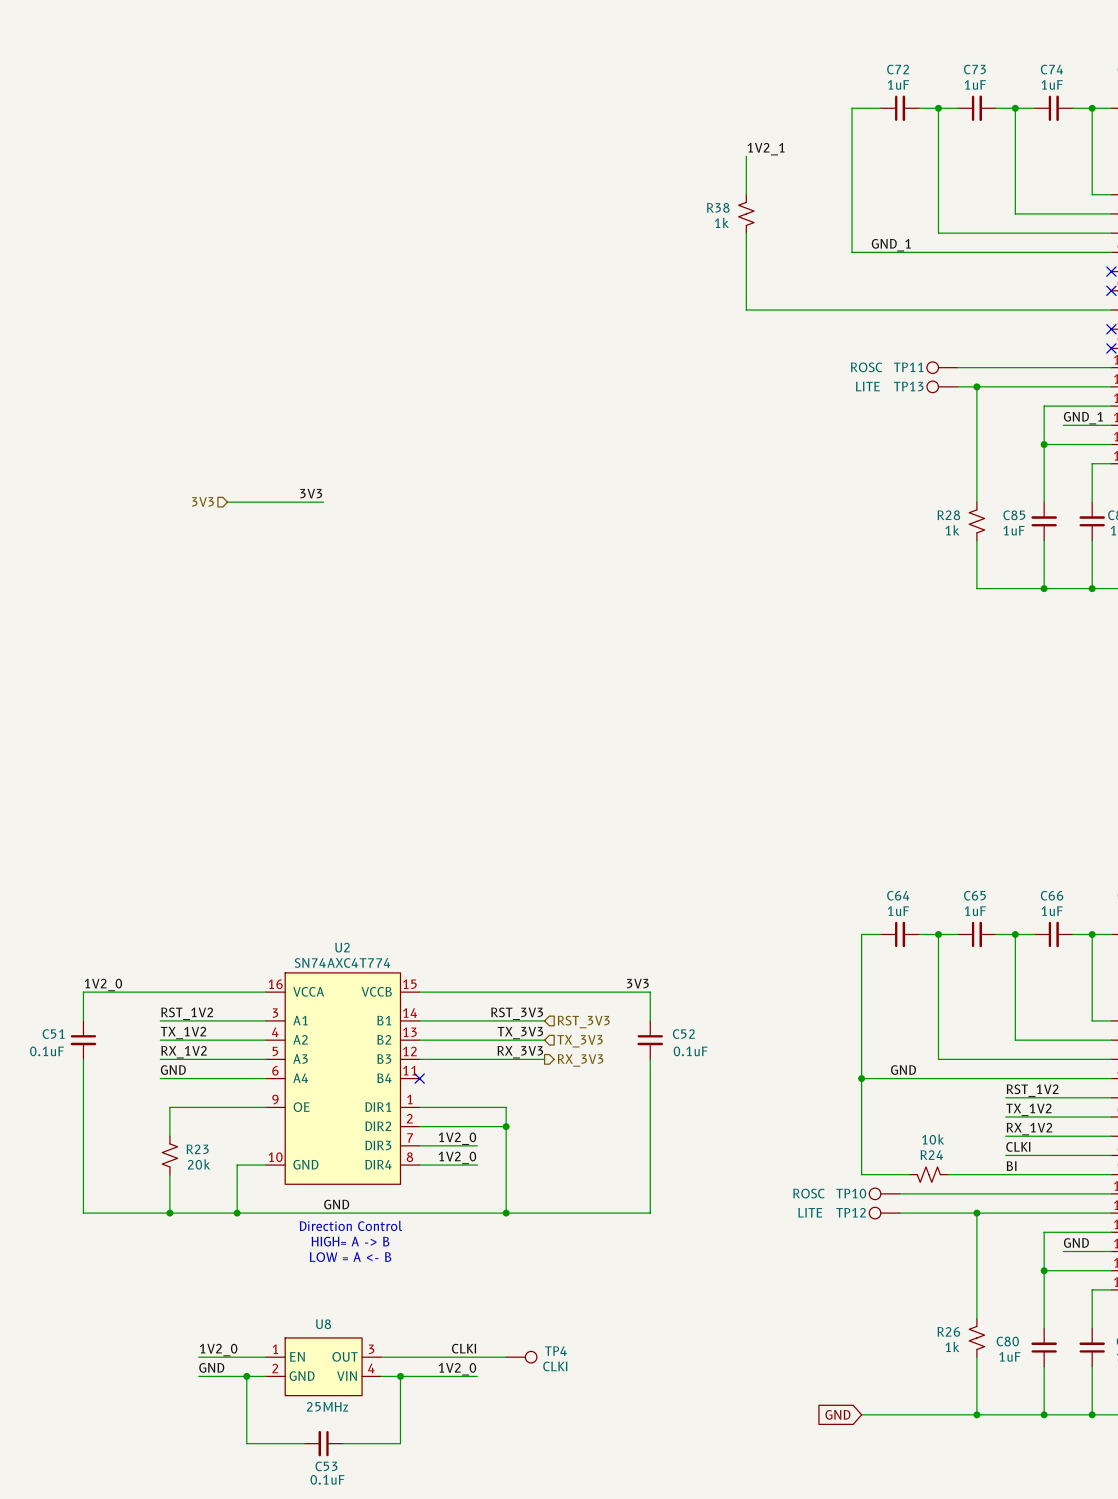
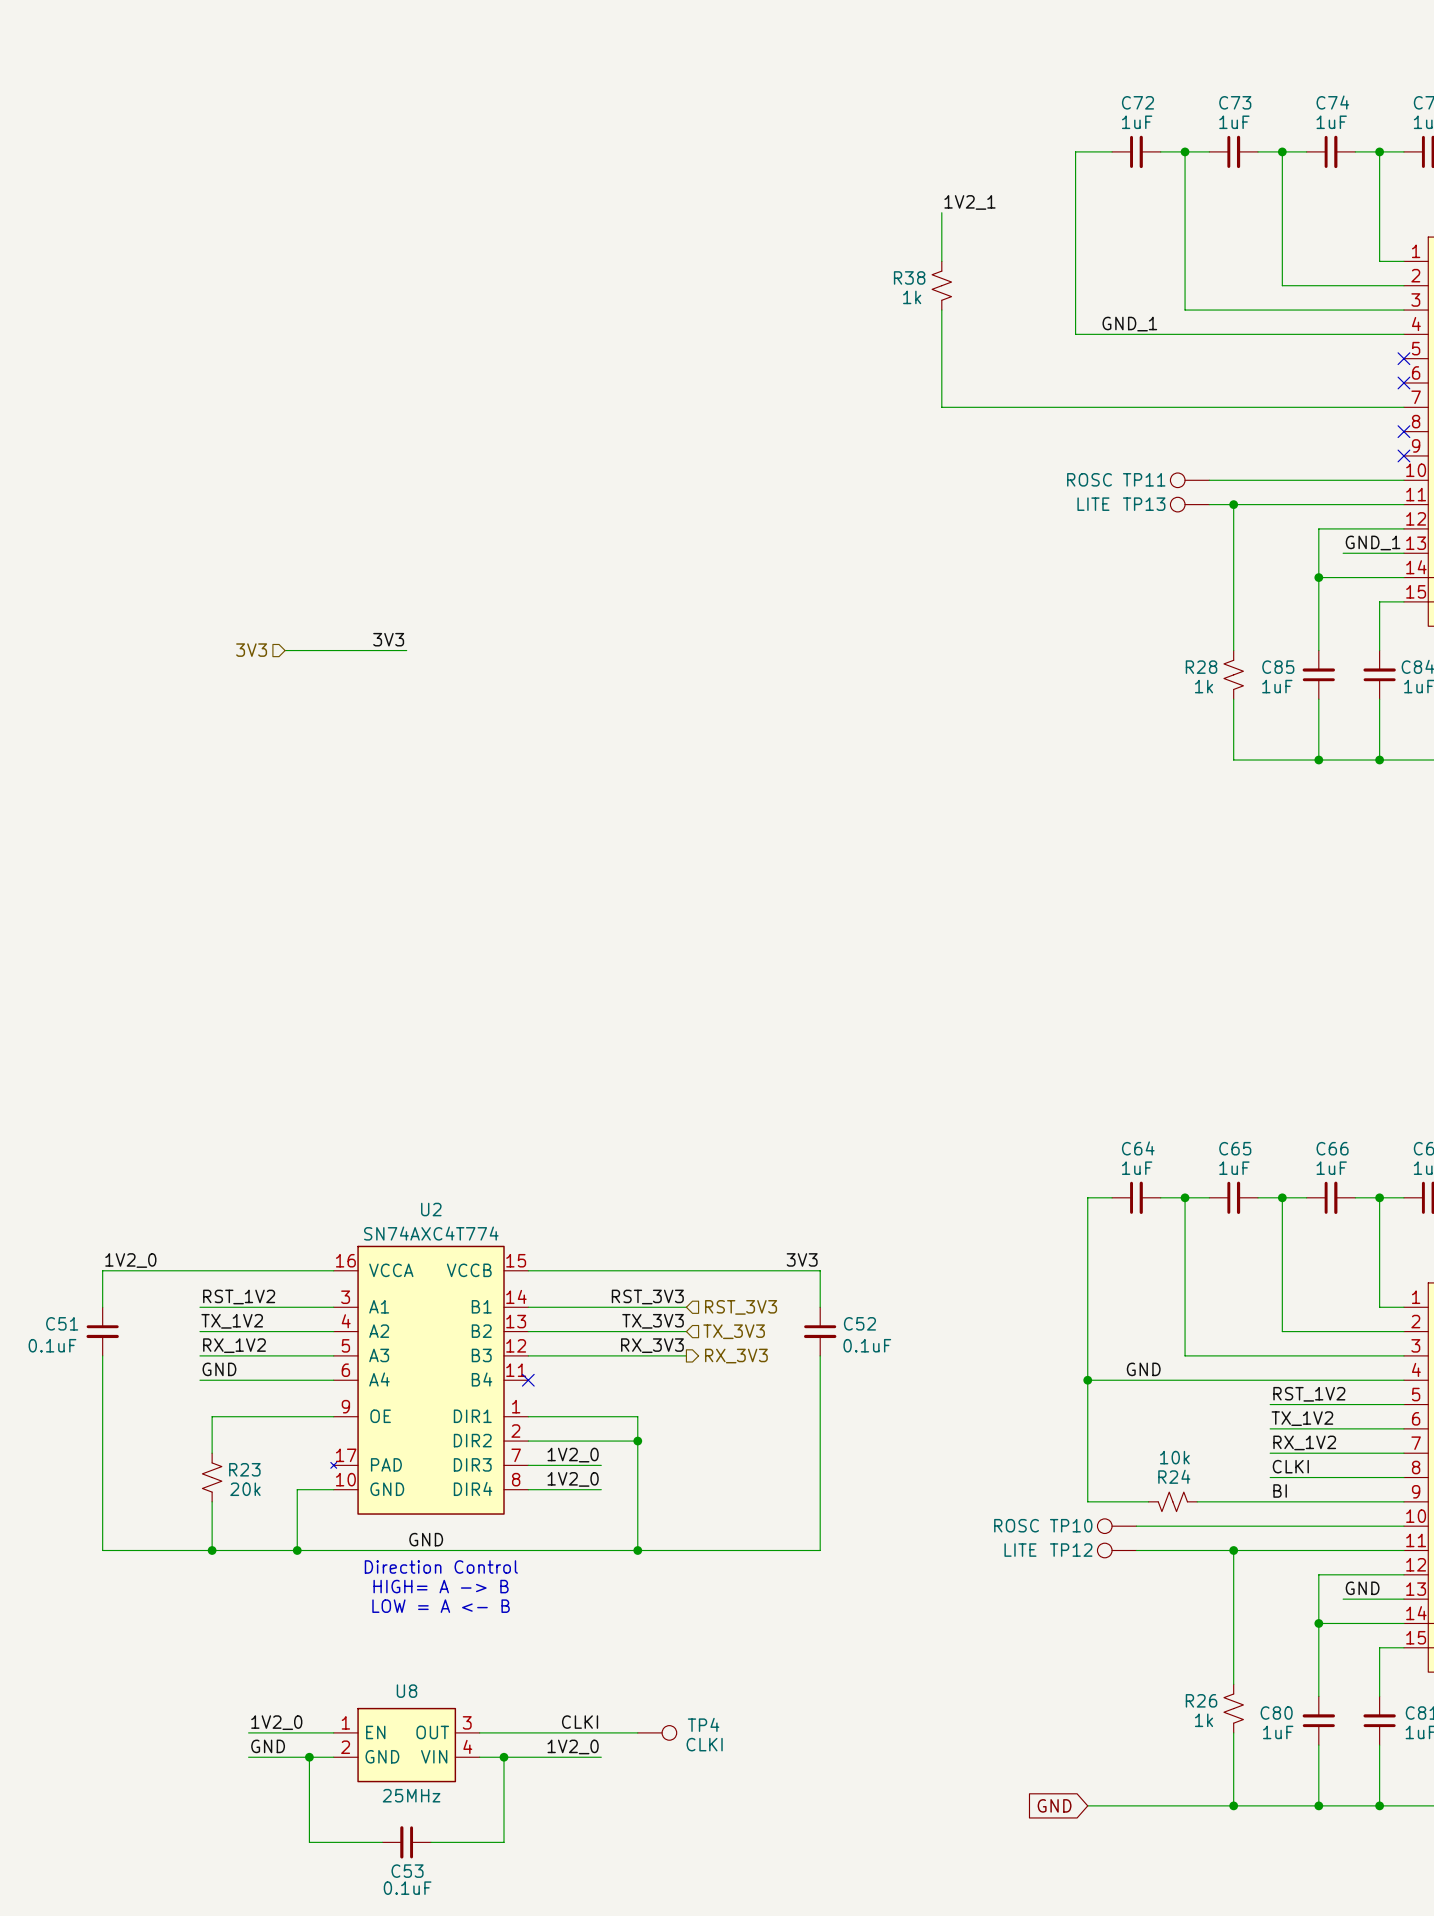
U2 symbol: [265, 972, 420, 1185] -> [330, 1245, 529, 1515]

